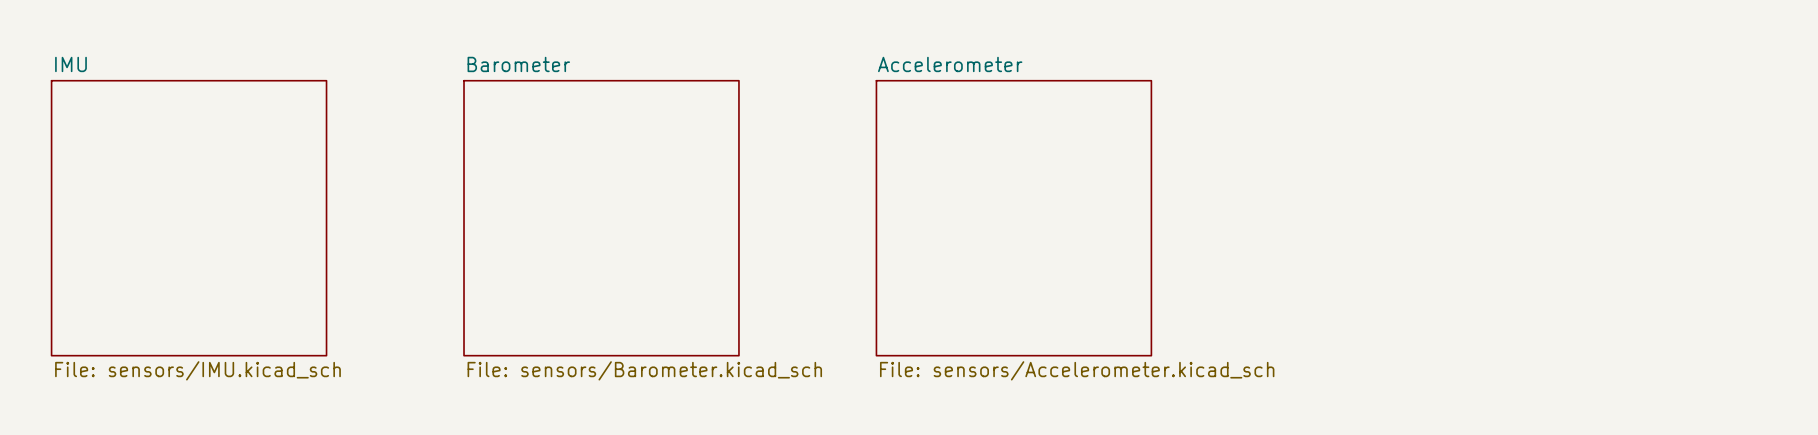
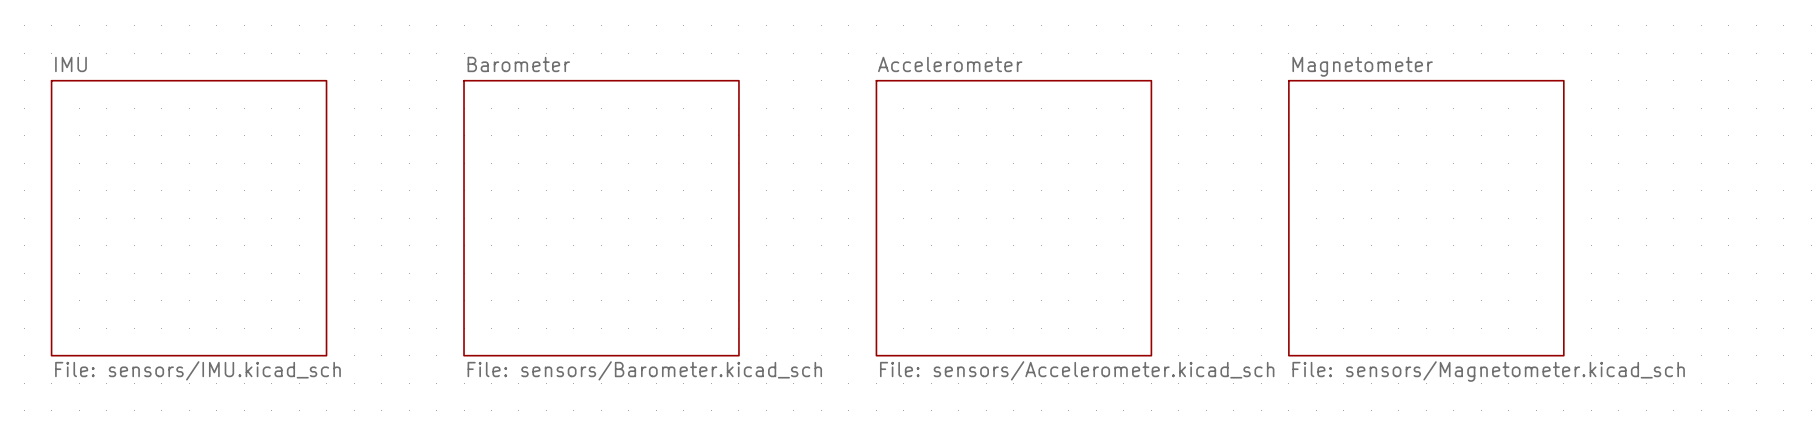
sheet Magnetometer: none -> File: sensors/Magnetometer.kicad_sch (1426, 218)

